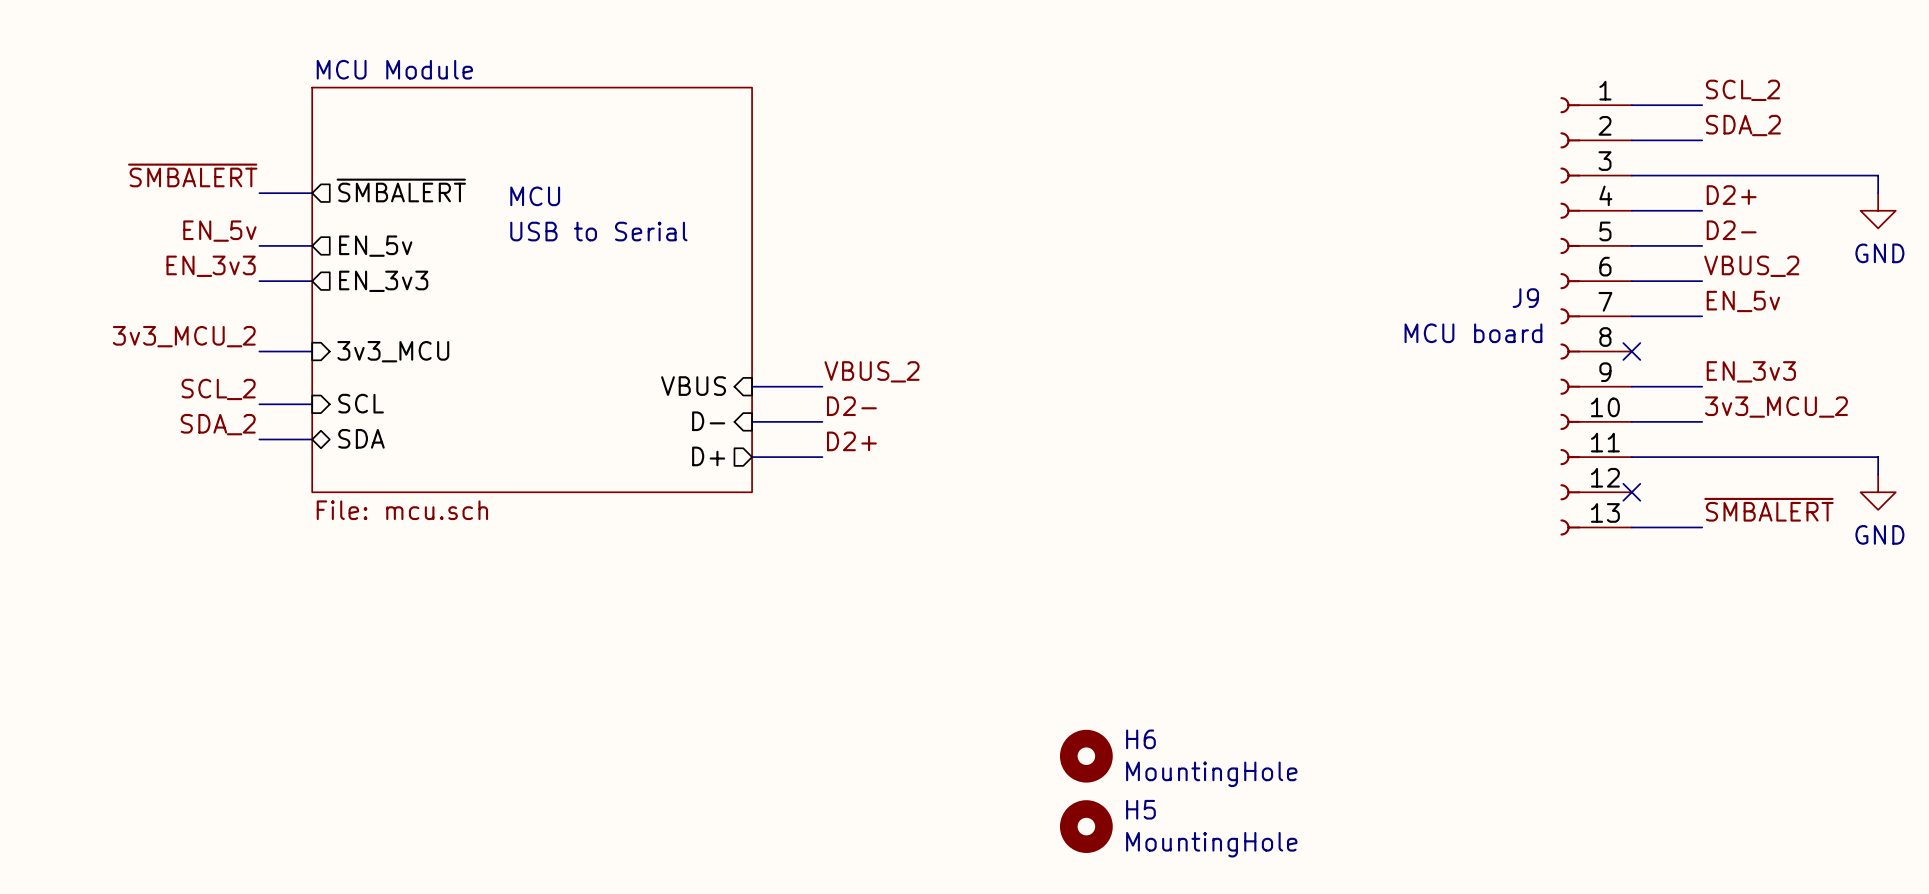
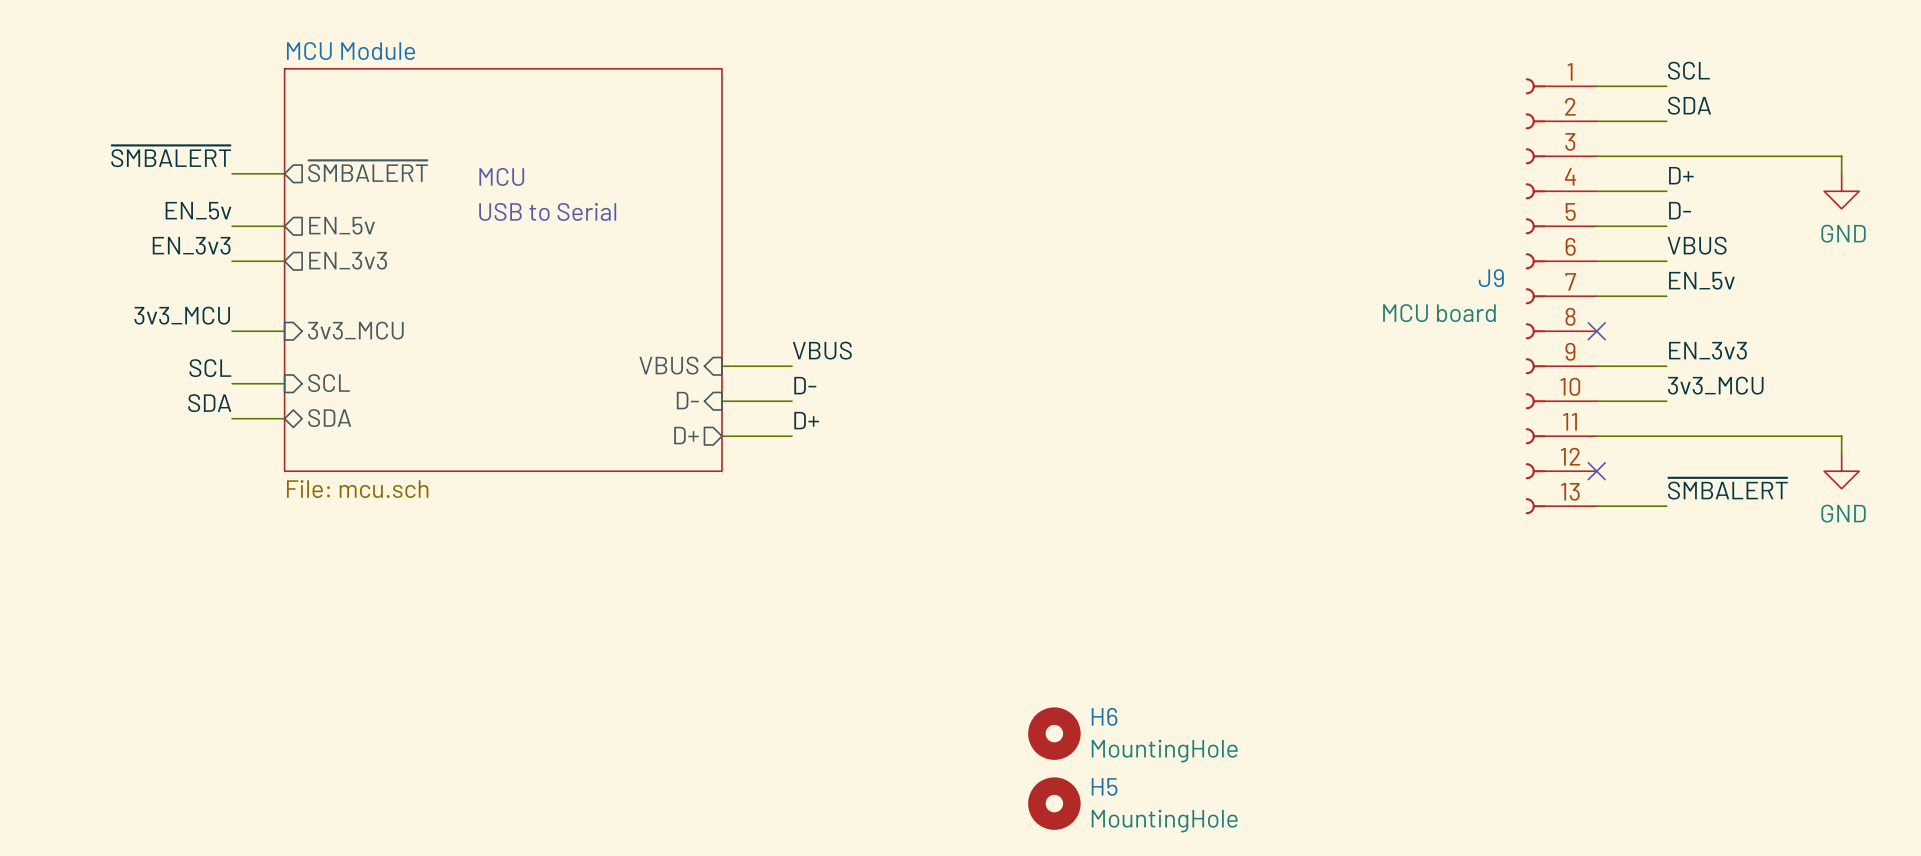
label: SCL_2 (1742, 90) -> SCL (1688, 70)
label: SDA_2 (1743, 125) -> SDA (1689, 105)
label: D2+ (1731, 195) -> D+ (1681, 175)
label: D2- (1731, 230) -> D- (1680, 210)
label: VBUS_2 (1751, 266) -> VBUS (1697, 245)
label: 3v3_MCU_2 (184, 336) -> 3v3_MCU (182, 315)
label: VBUS_2 (872, 371) -> VBUS (822, 350)
label: SCL_2 (218, 389) -> SCL (210, 368)
label: D2- (851, 406) -> D- (805, 385)
label: 3v3_MCU_2 (1776, 407) -> 3v3_MCU (1715, 385)
label: SDA_2 (218, 424) -> SDA (209, 403)
label: D2+ (851, 441) -> D+ (806, 420)

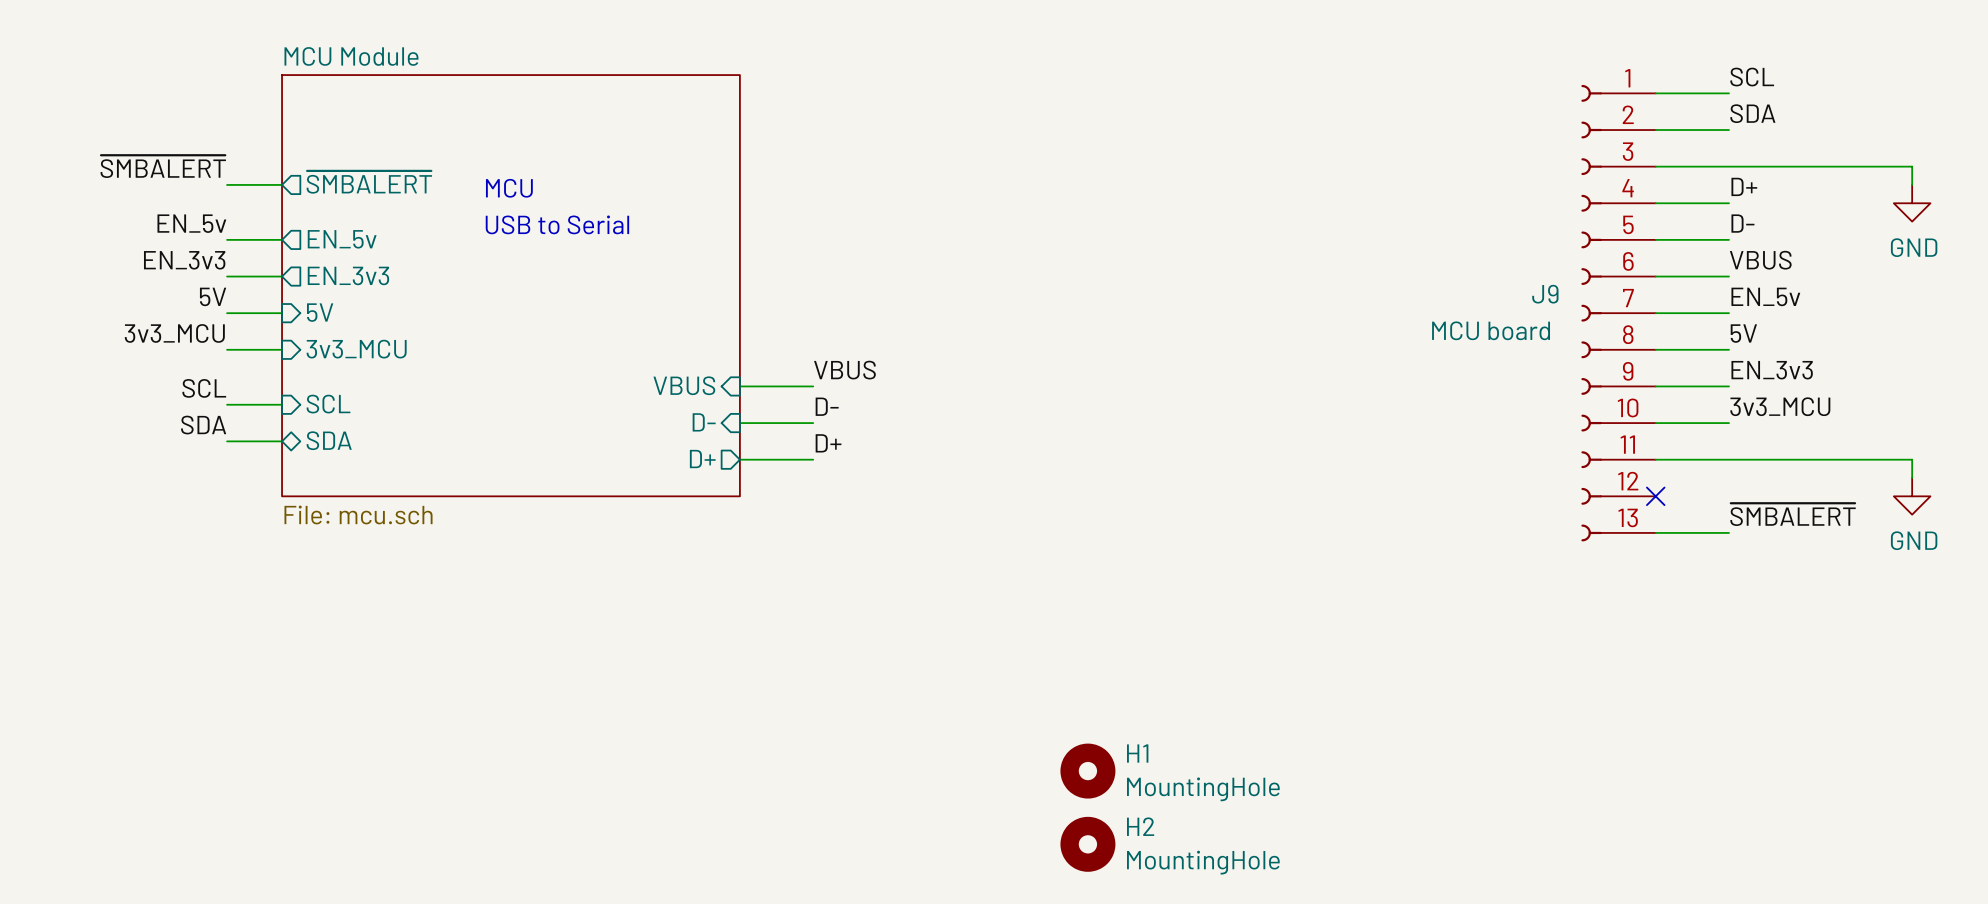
label: none -> 5V (213, 296)
sheet pin: none -> 5V (320, 312)
wire: none -> (227, 313) (282, 313)
label: none -> 5V (1743, 333)
wire: none -> (1655, 349) (1728, 349)
no-connect mark: (1596, 331) -> none
H6 name: H6 (1104, 716) -> H1 (1137, 753)
H5 name: H5 (1104, 786) -> H2 (1140, 826)

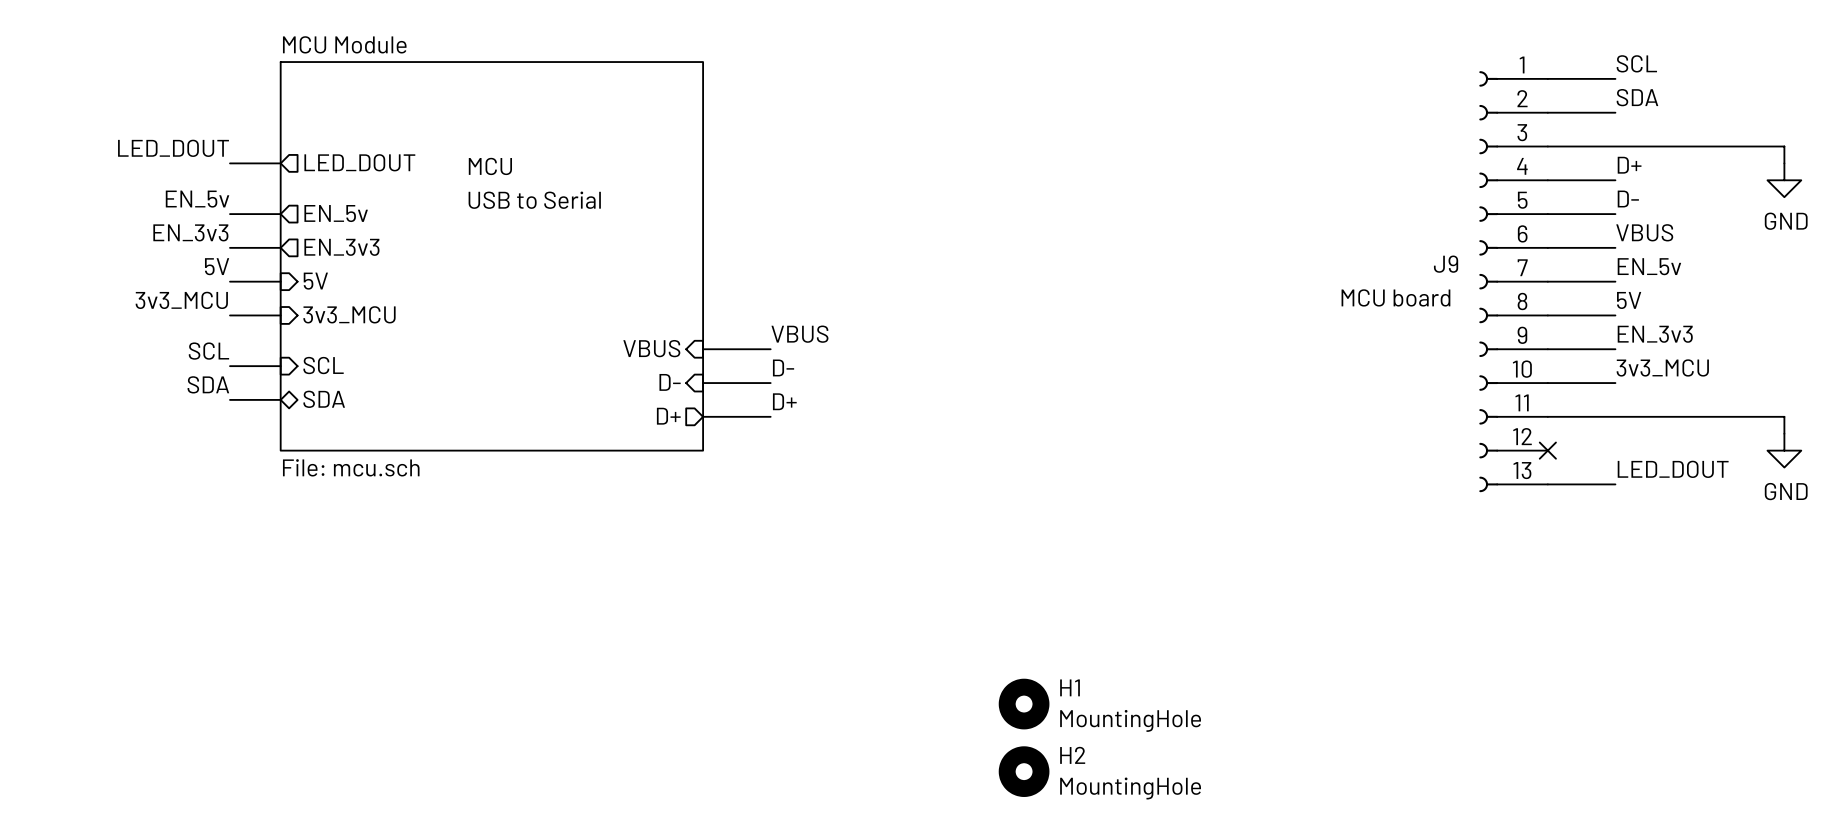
label: ~{SMBALERT} (163, 166) -> LED_DOUT (173, 148)
sheet pin: ~{SMBALERT} (369, 182) -> LED_DOUT (359, 162)
label: ~{SMBALERT} (1793, 514) -> LED_DOUT (1673, 469)

